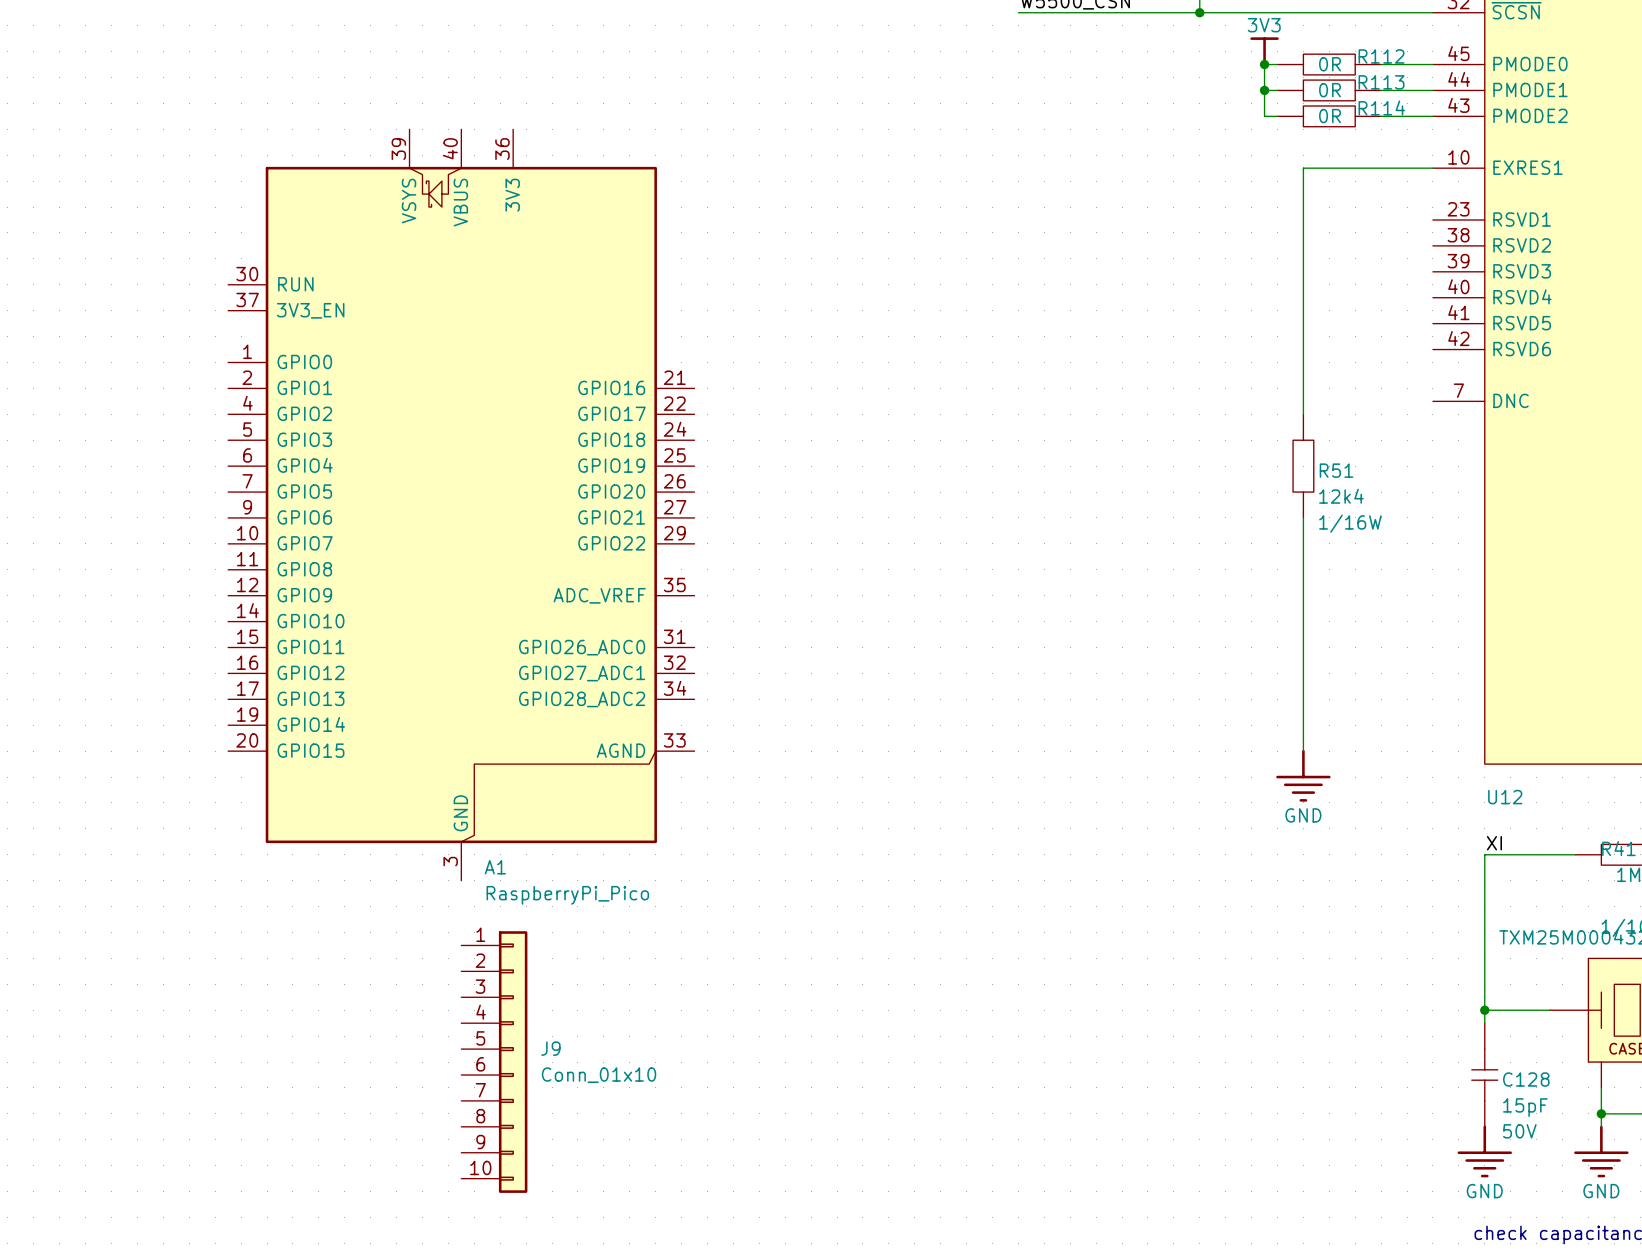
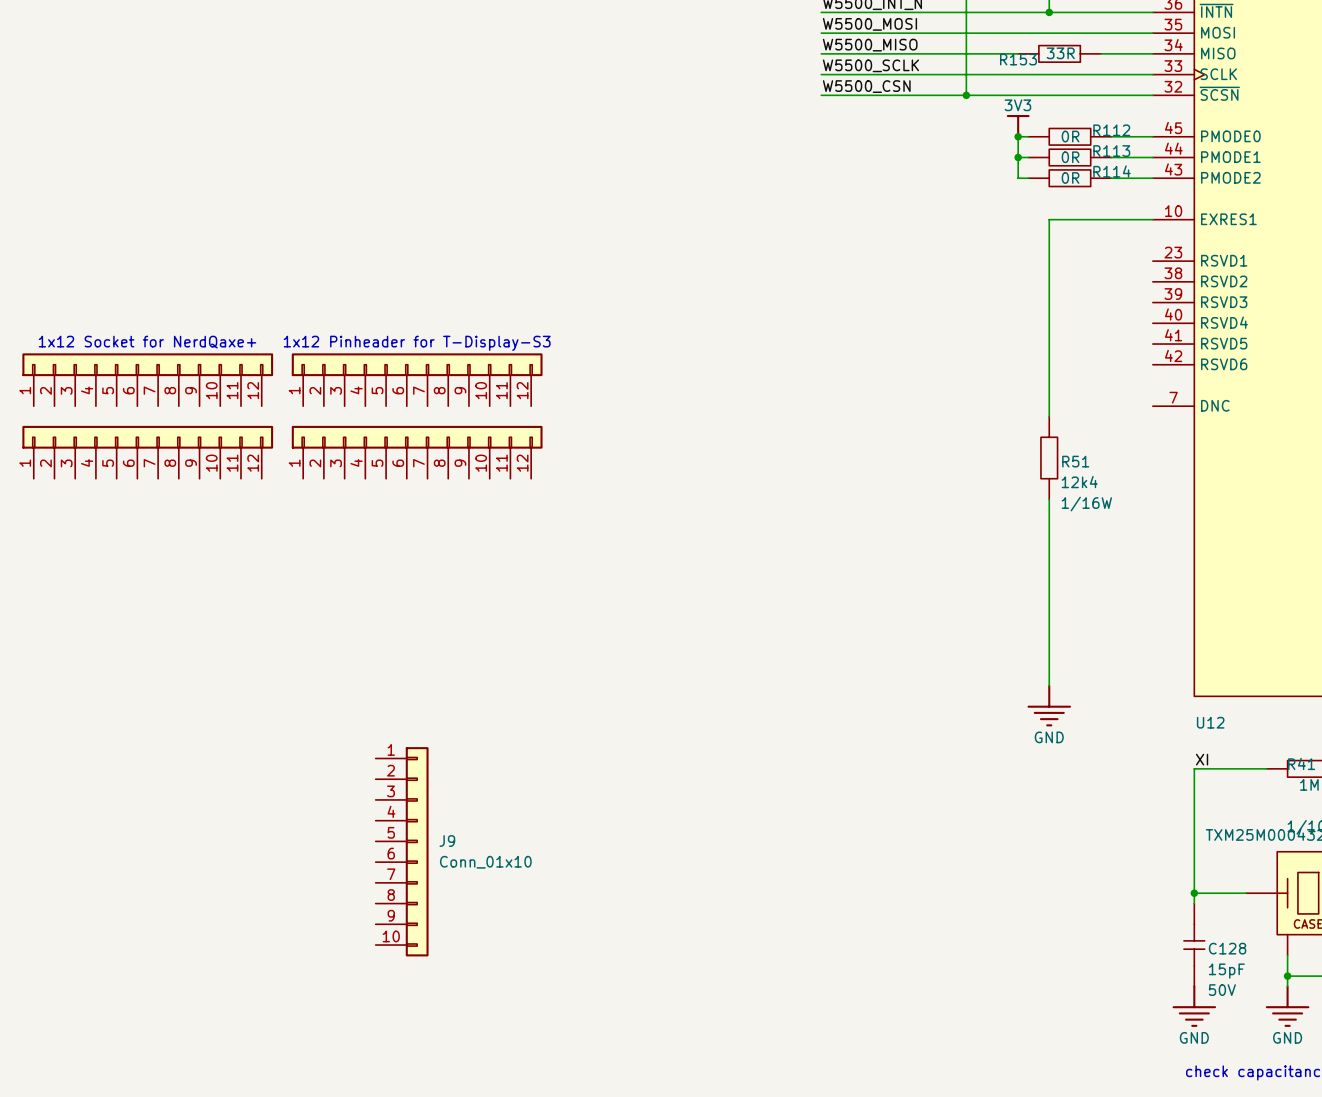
text: none -> 1x12 Socket for NerdQaxe+ (147, 342)
text: none -> 1x12 Pinheader for T-Display-S3 (417, 343)
part: none -> (147, 379)
part: none -> (417, 379)
part: none -> (147, 452)
part: none -> (417, 452)
A1: RaspberryPi_Pico (461, 505) -> none
J9 position: (494, 1062) -> (402, 851)

